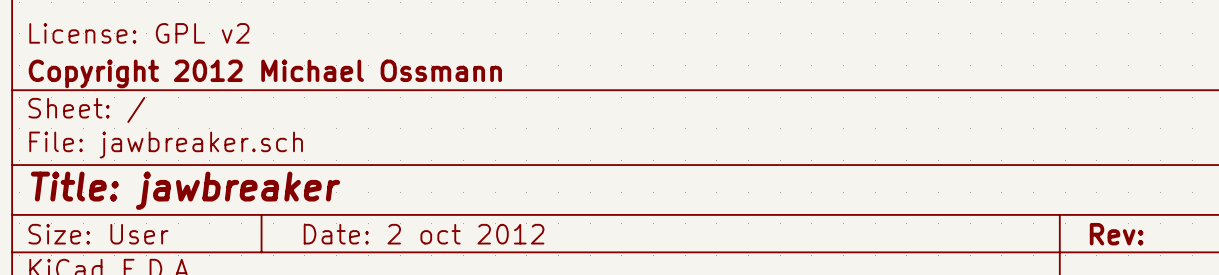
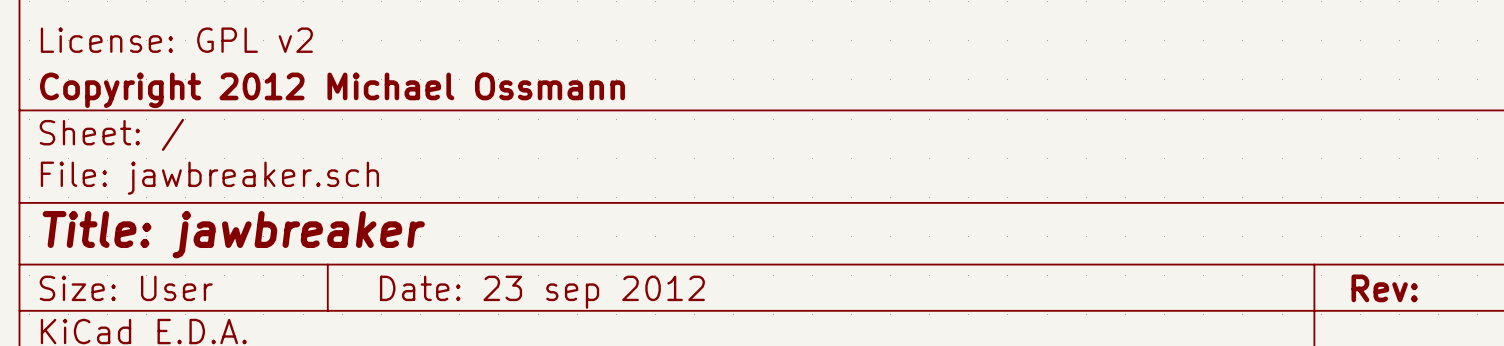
title block: Date: 2 oct 2012 (424, 234) -> Date: 23 sep 2012 (542, 292)

